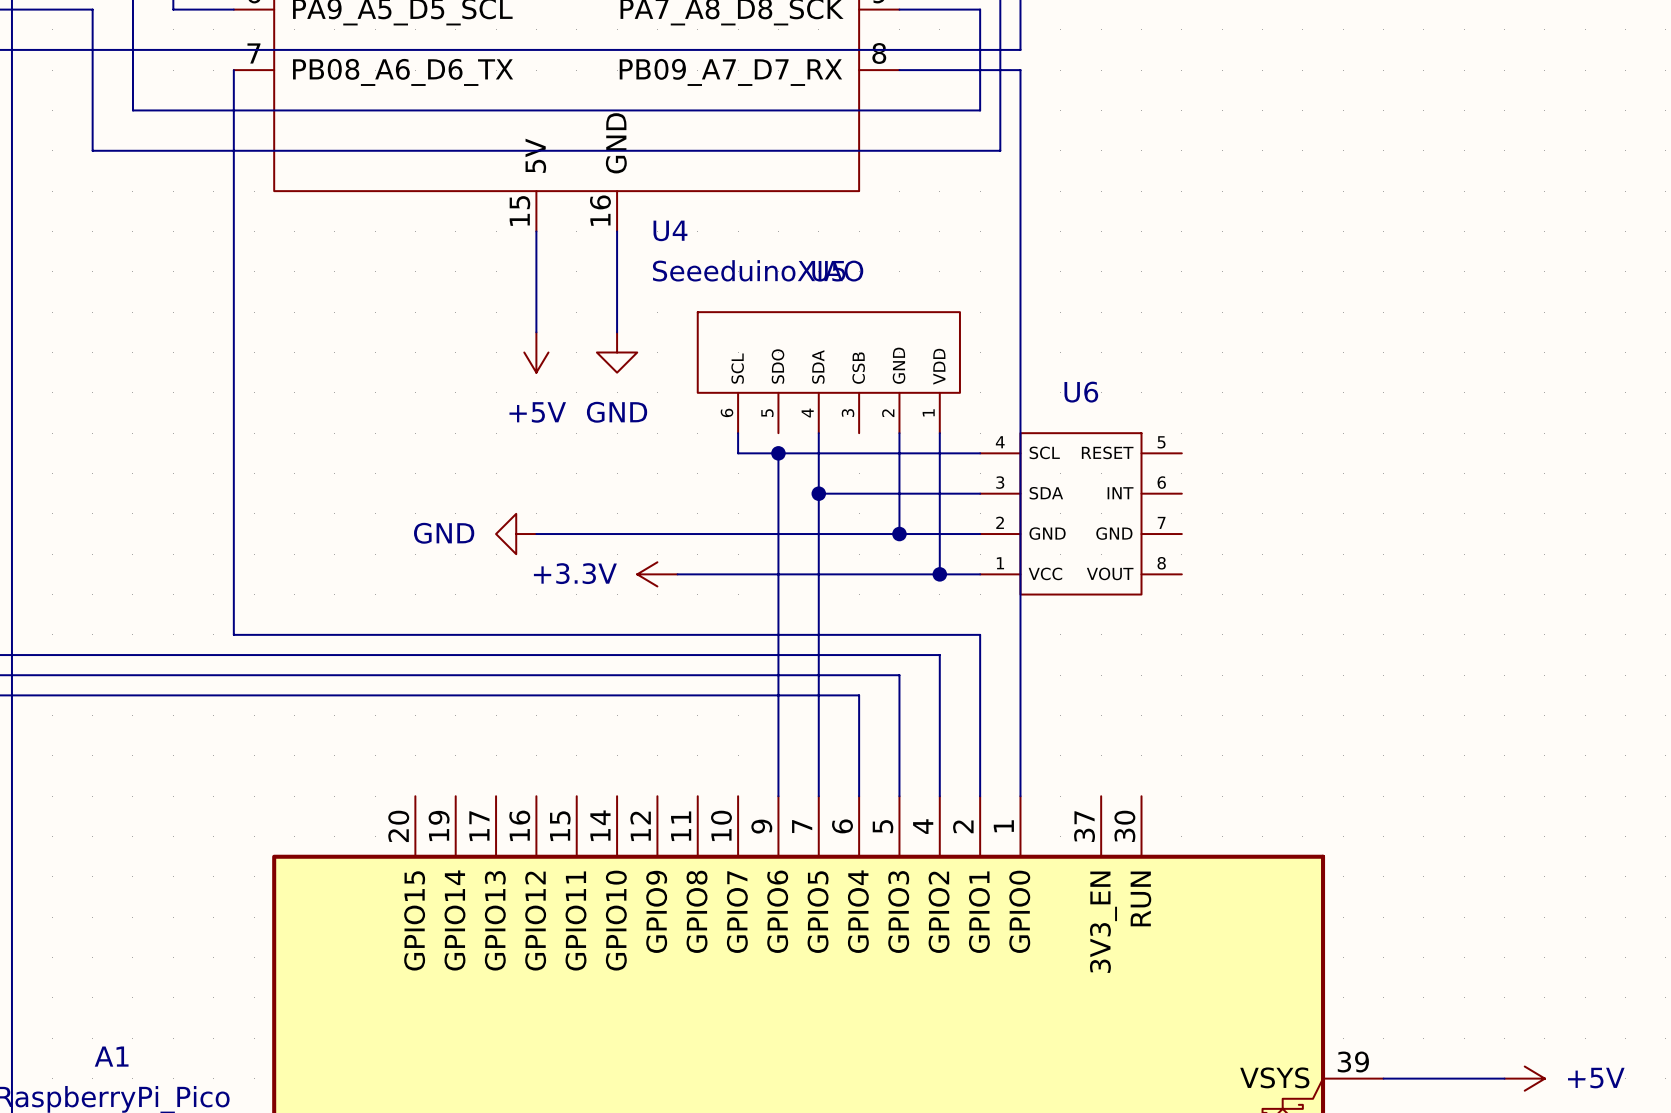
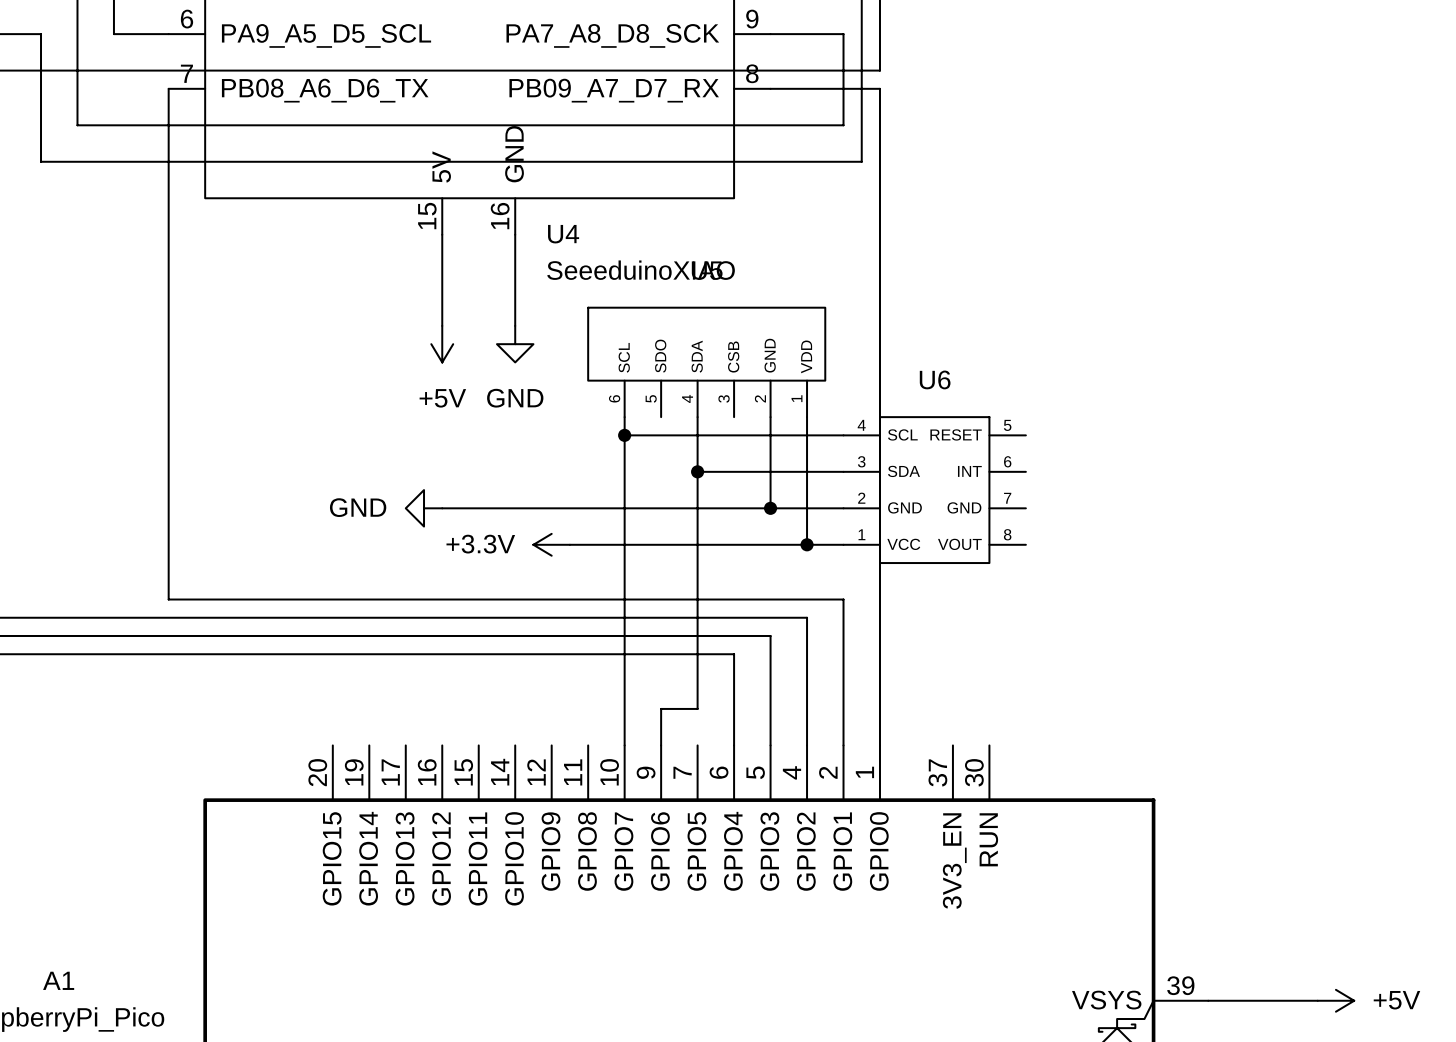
wire: none -> (624, 435) (624, 745)
wire: (778, 453) (778, 755) -> none
junction position: (778, 453) -> (624, 435)
wire: (818, 755) (818, 796) -> (697, 708) (661, 708)

